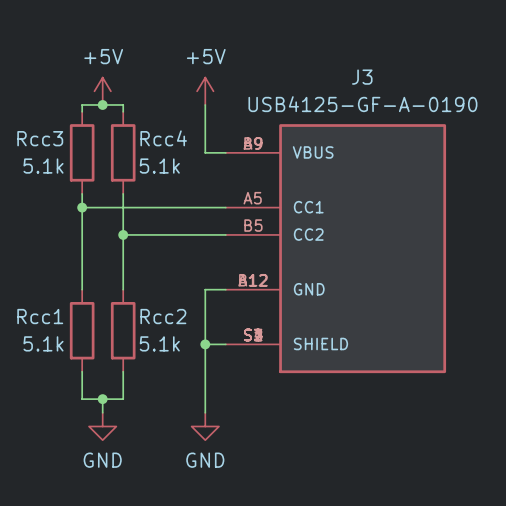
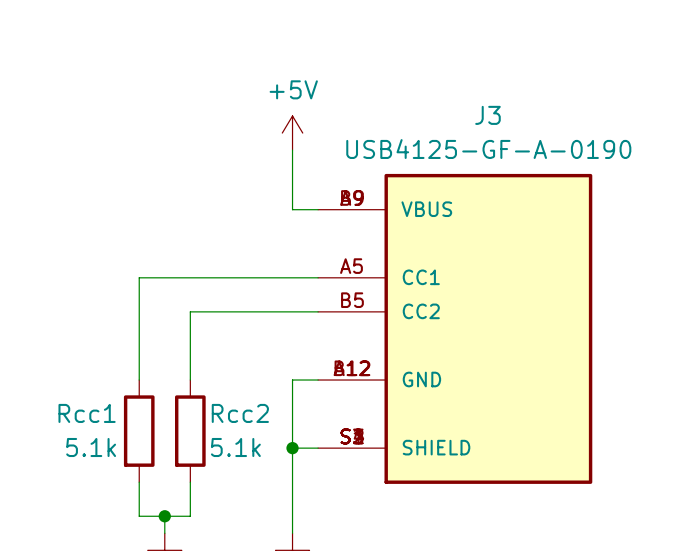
power symbol: +5V (102, 91) -> none
junction: (102, 104) -> none
wire: (82, 111) (82, 104) (123, 104) (123, 111) -> none
Rcc3: 5.1k (82, 152) -> none
Rcc4: 5.1k (123, 152) -> none
wire: (82, 193) (82, 207) -> none
wire: (123, 193) (123, 234) -> none
junction: (82, 207) -> none
junction: (123, 234) -> none

